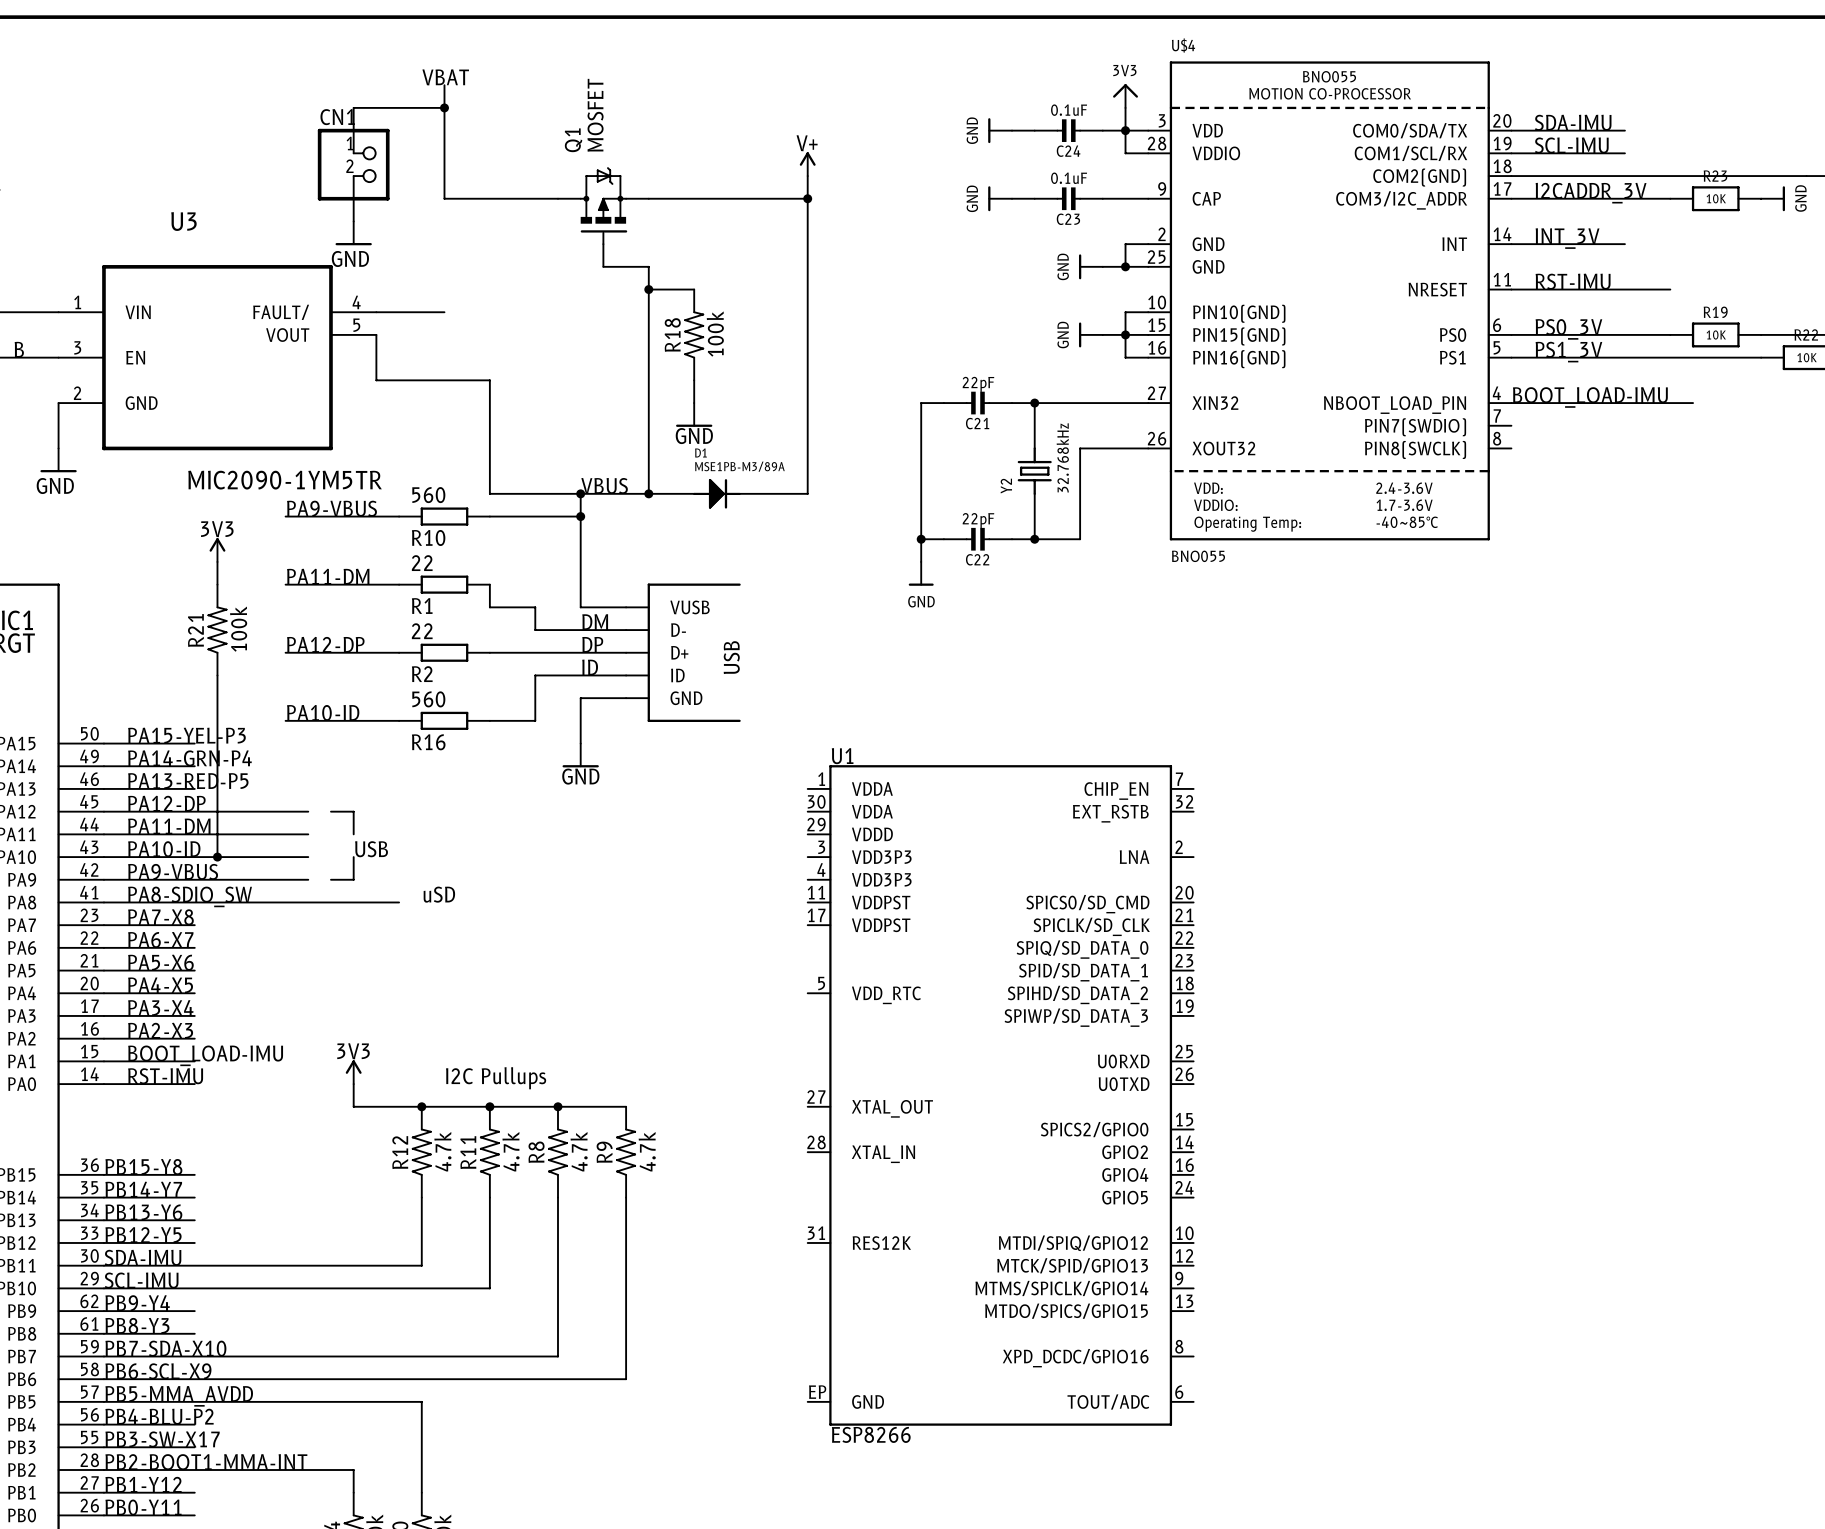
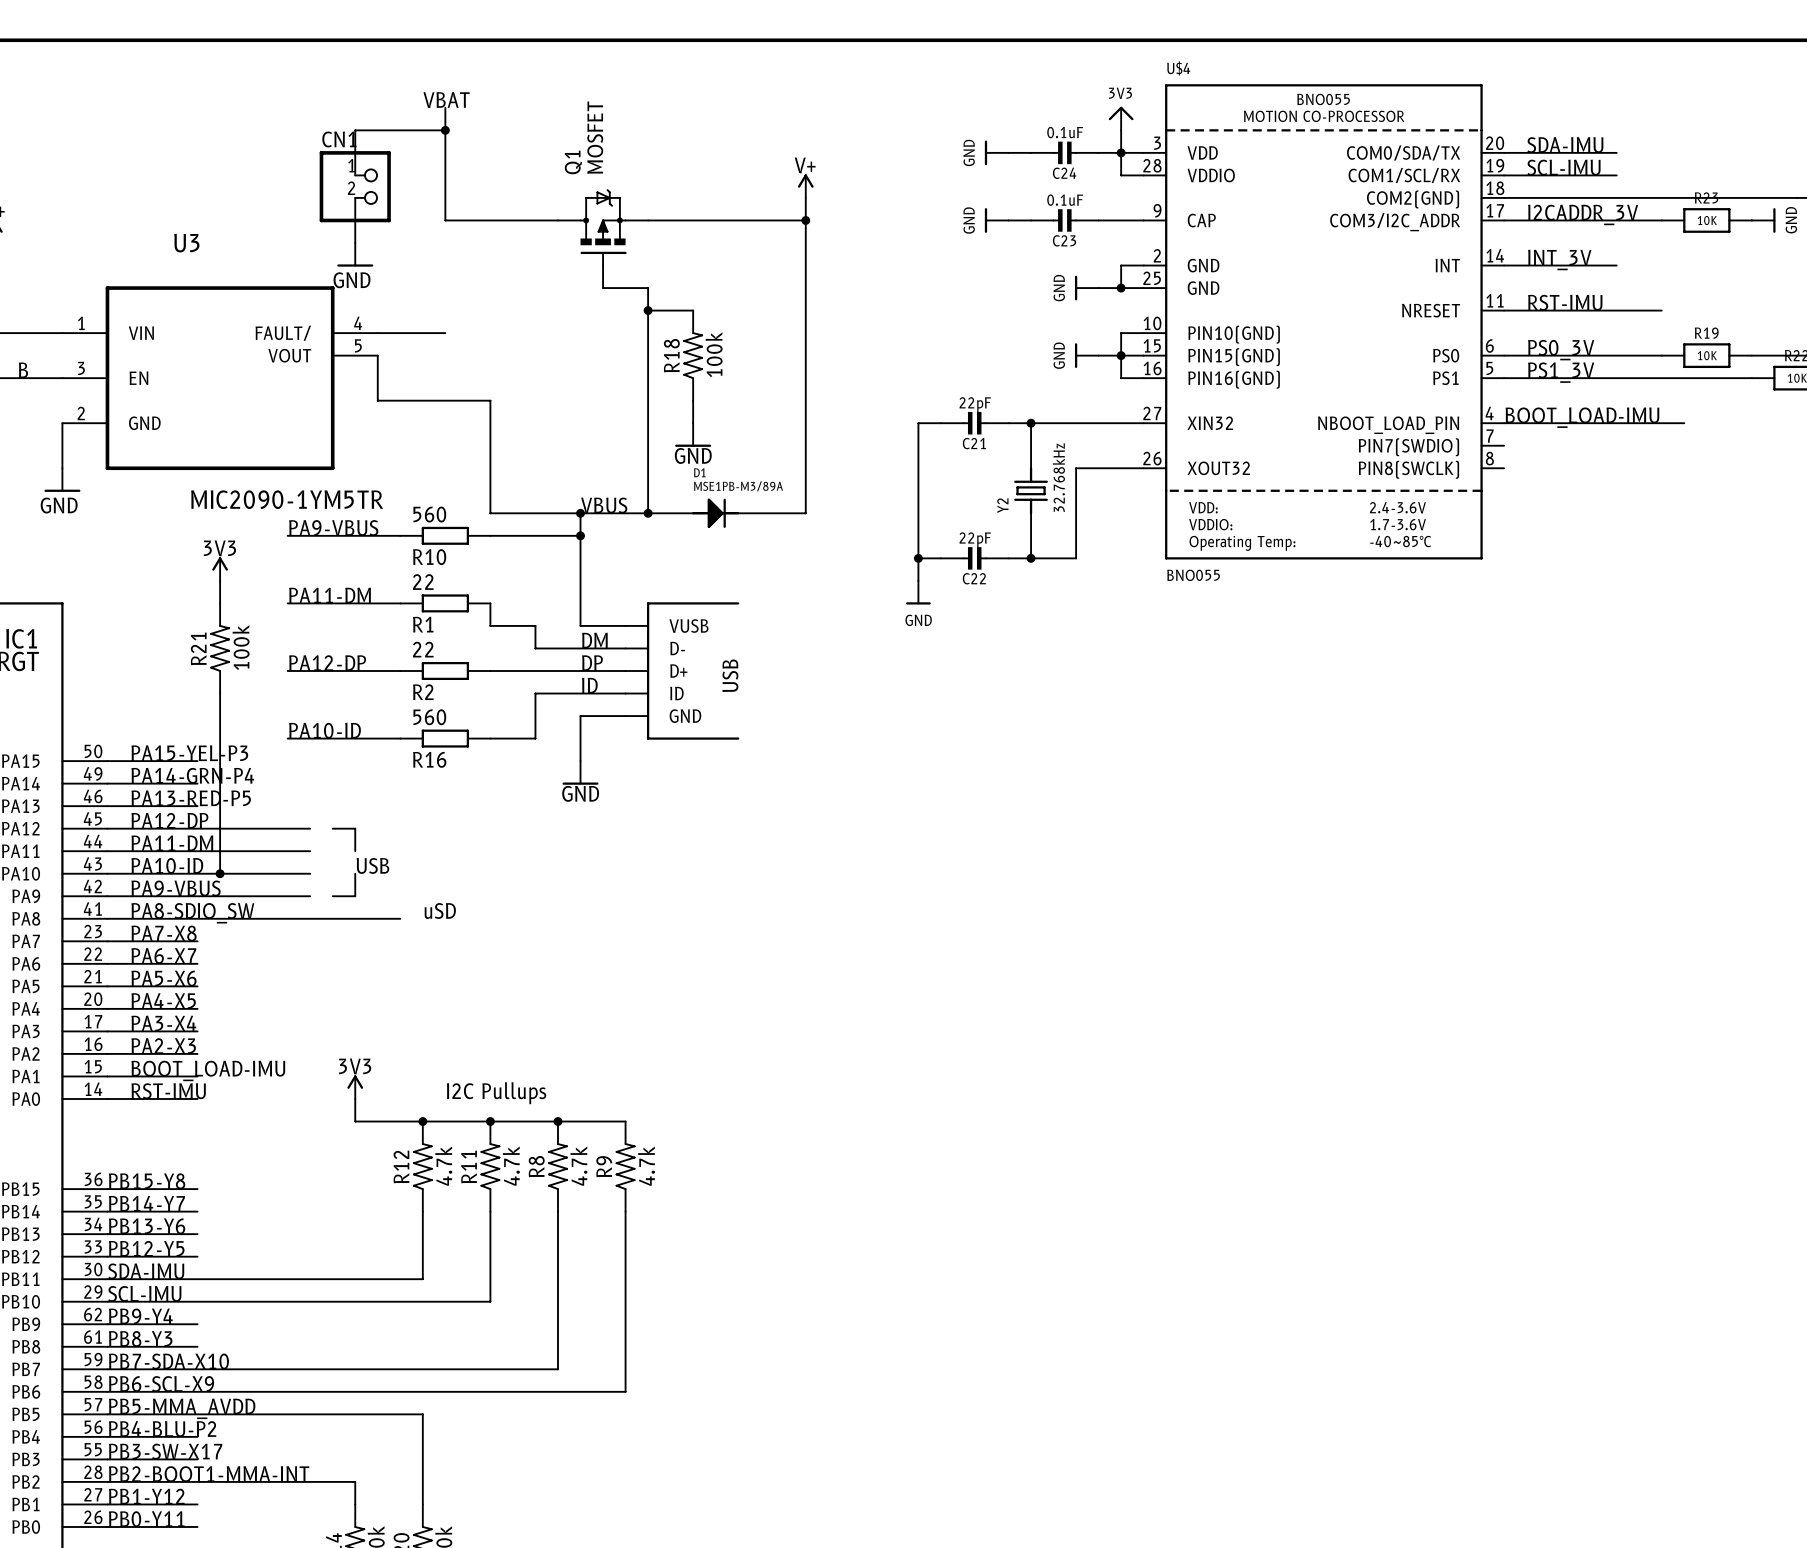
U1: ESP8266 (1000, 1095) -> none

